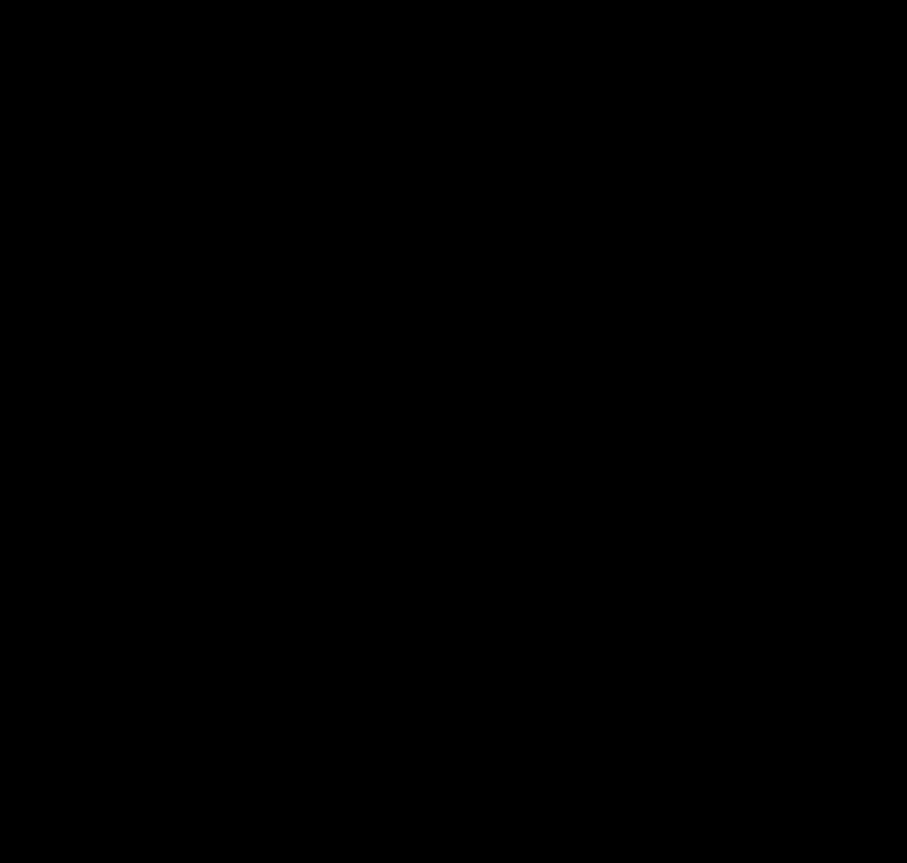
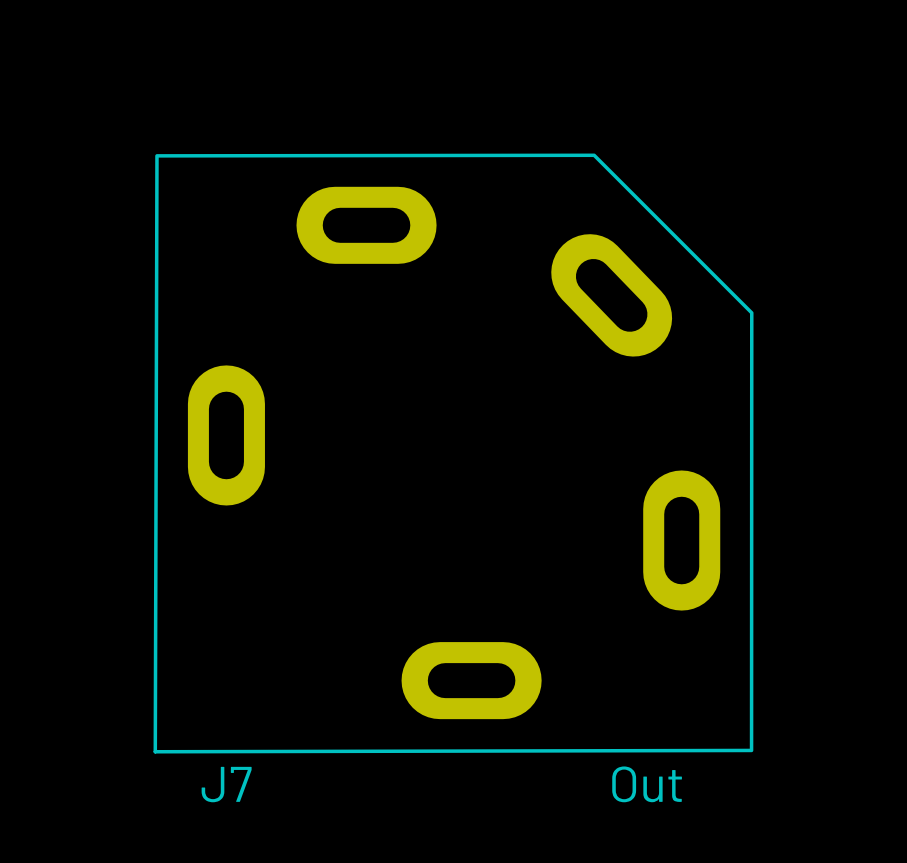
J7: none -> Out (453, 453)

